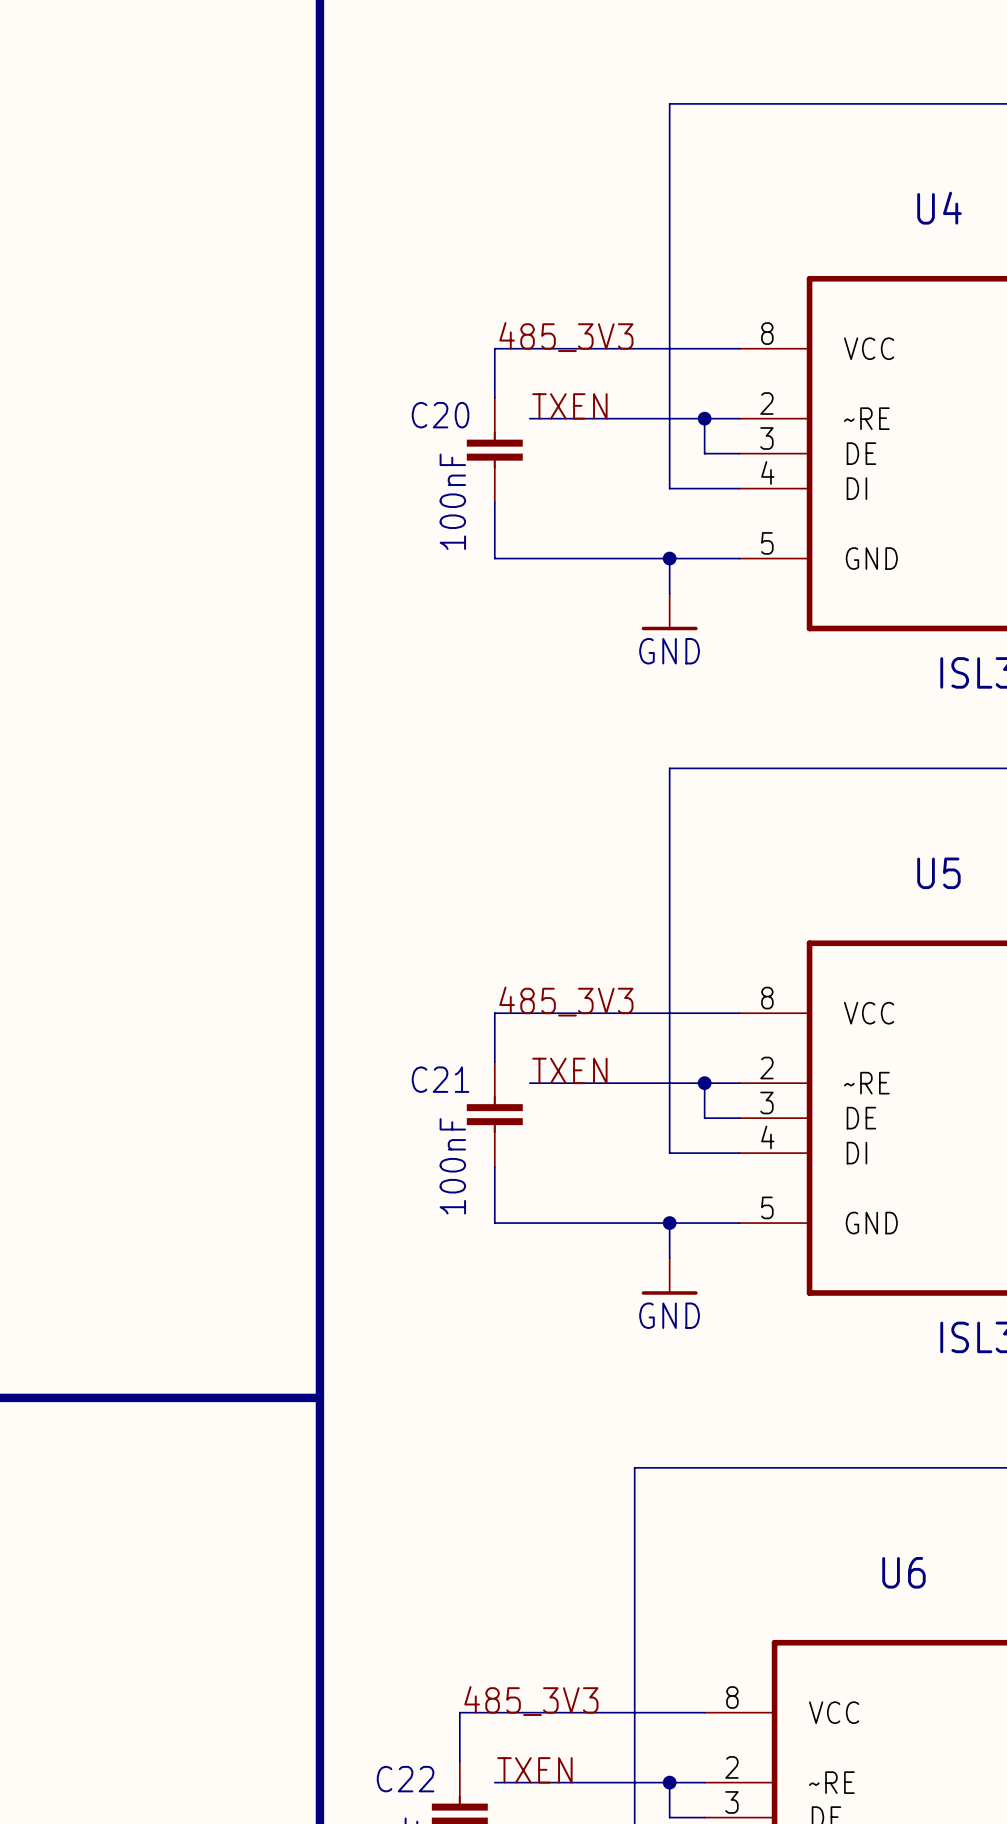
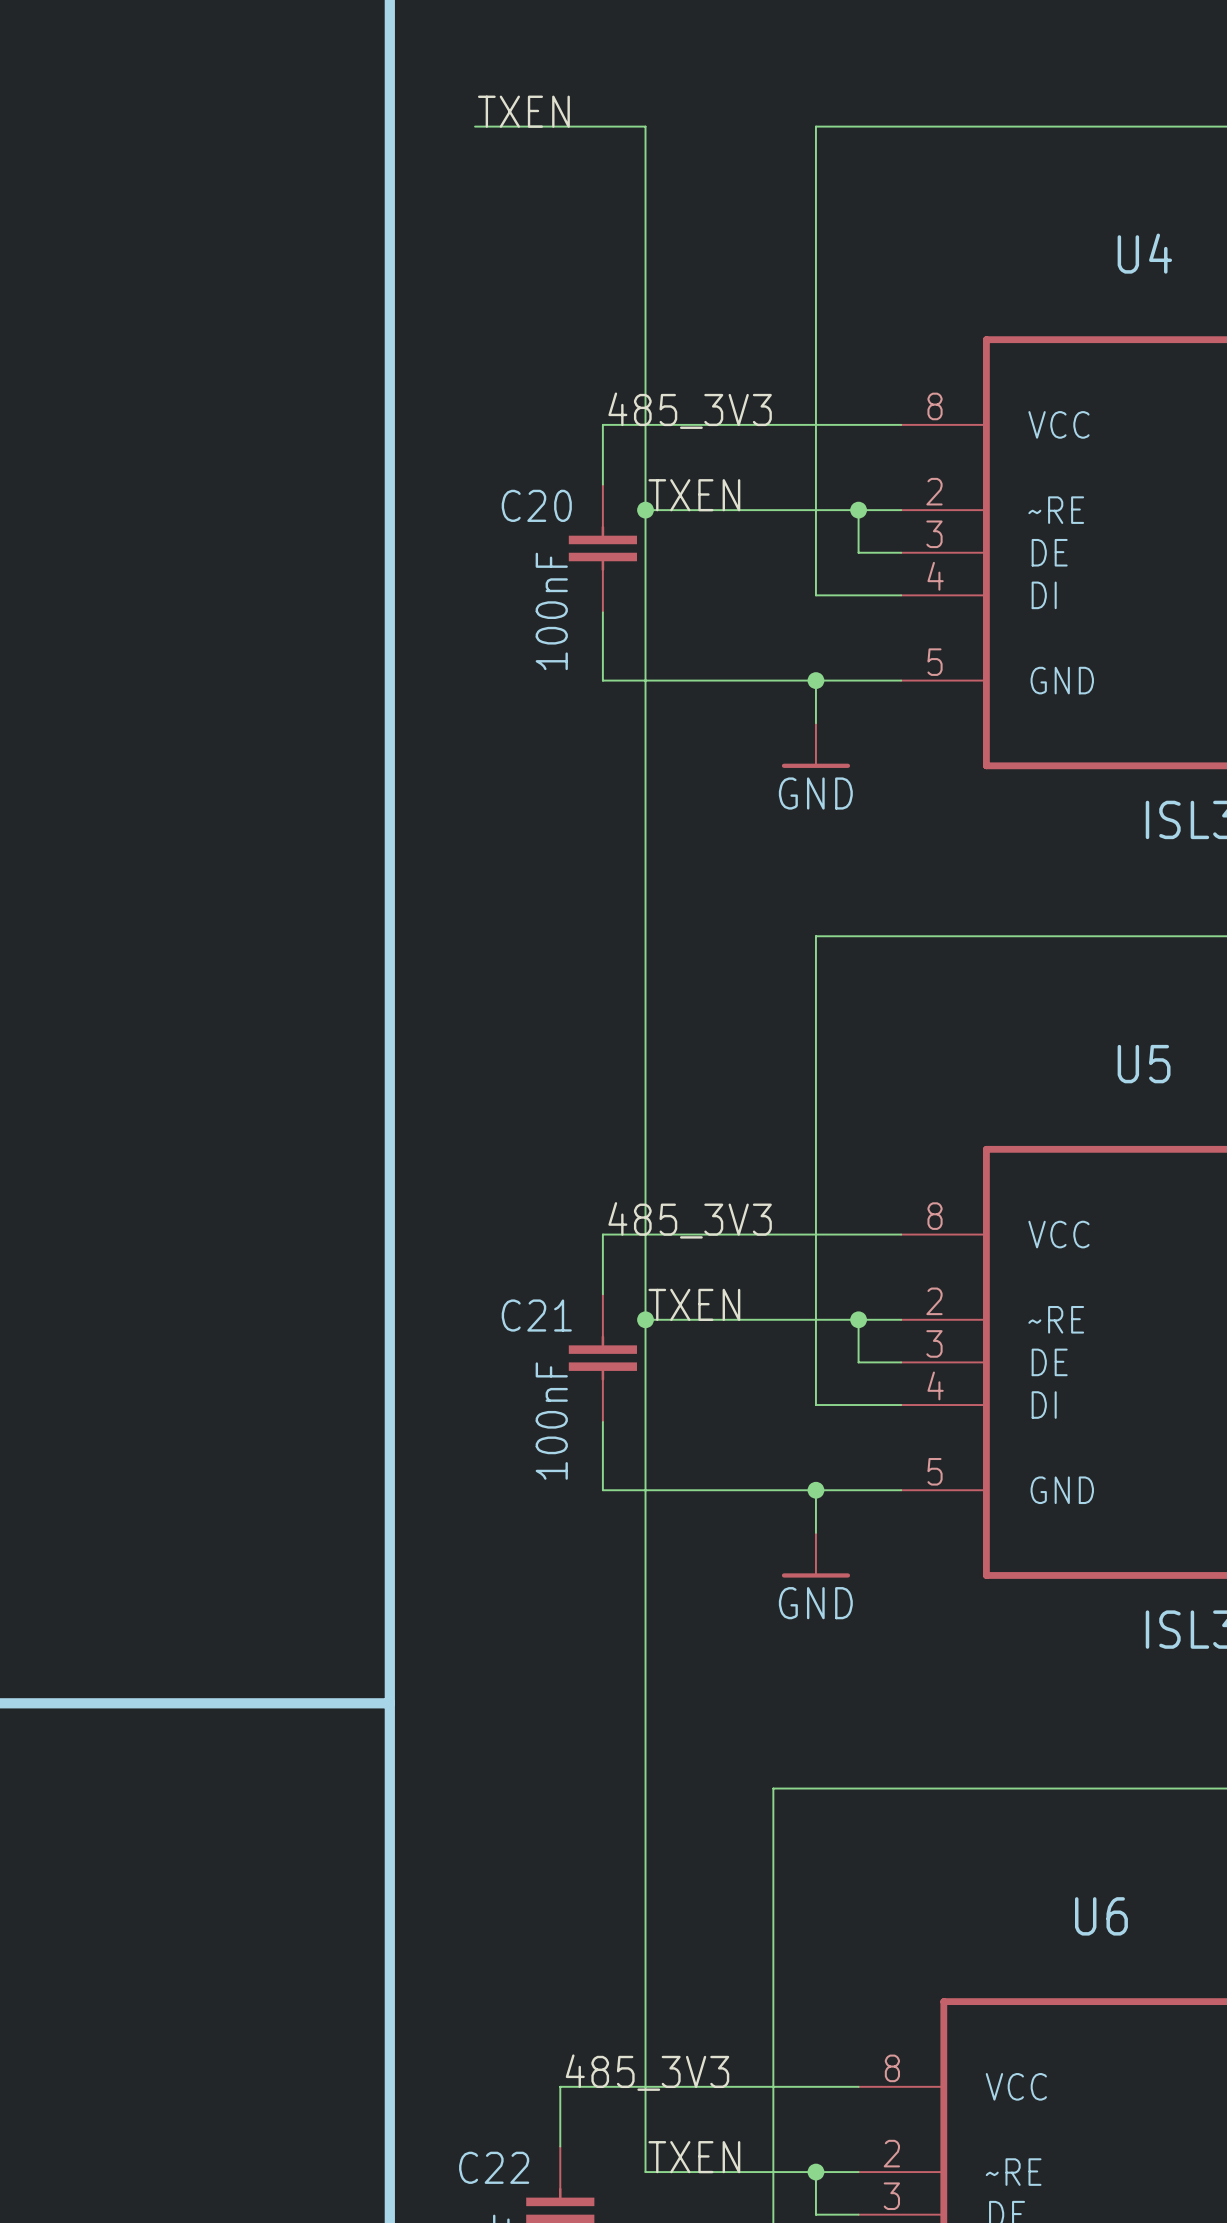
label: none -> TXEN (523, 111)
junction: none -> (645, 510)
junction: none -> (645, 1319)
label position: TXEN (534, 1770) -> TXEN (694, 2157)
wire: (494, 1782) (529, 1782) -> (475, 126) (645, 126) (645, 2172)

